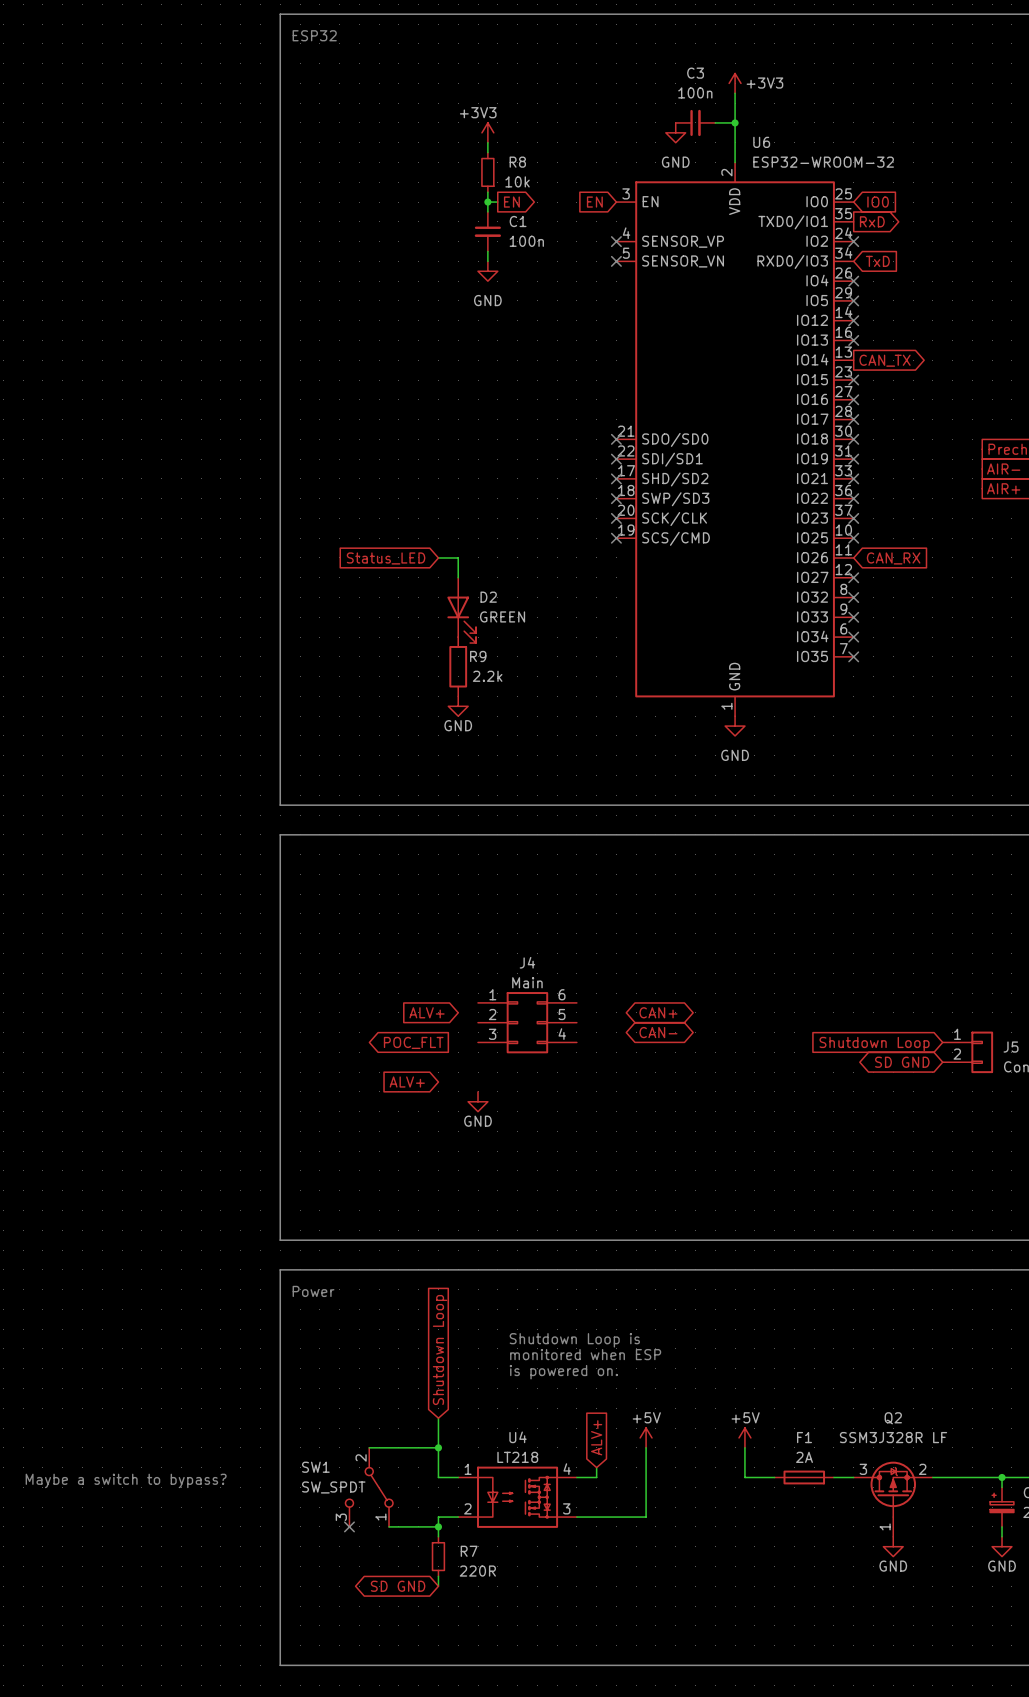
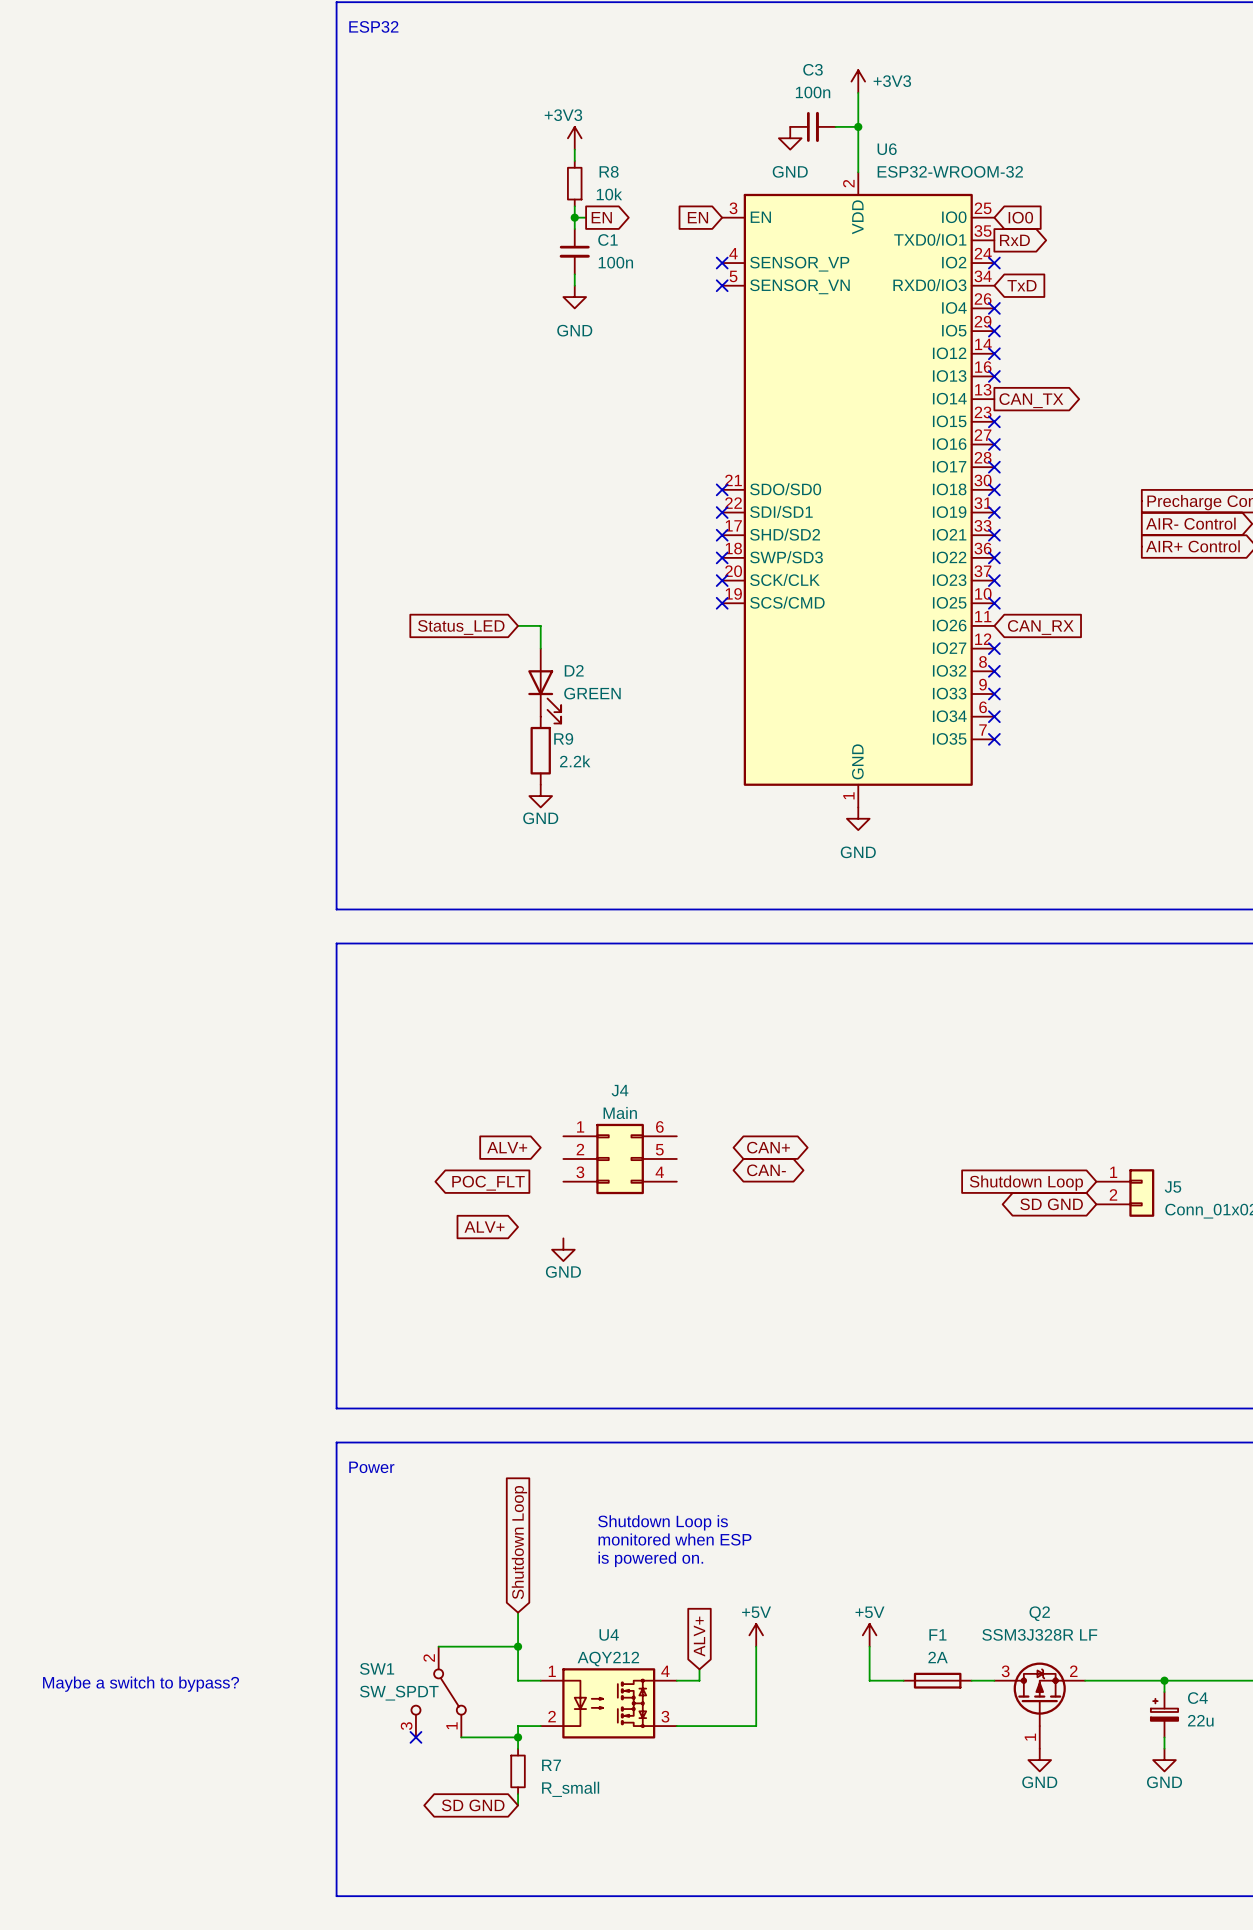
U4 value: LT218 (517, 1457) -> AQY212 (608, 1659)
R7 value: 220R (477, 1571) -> R_small (570, 1789)

